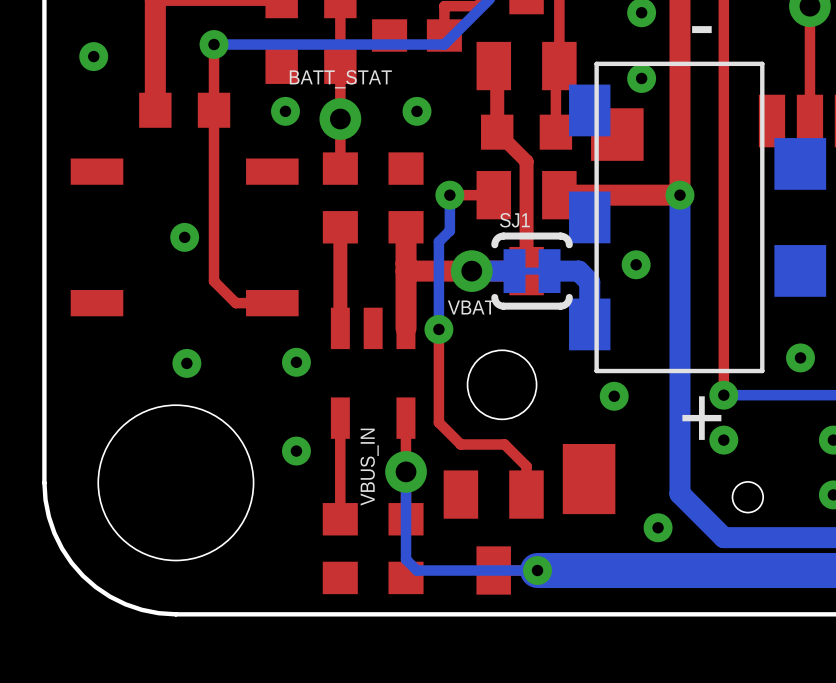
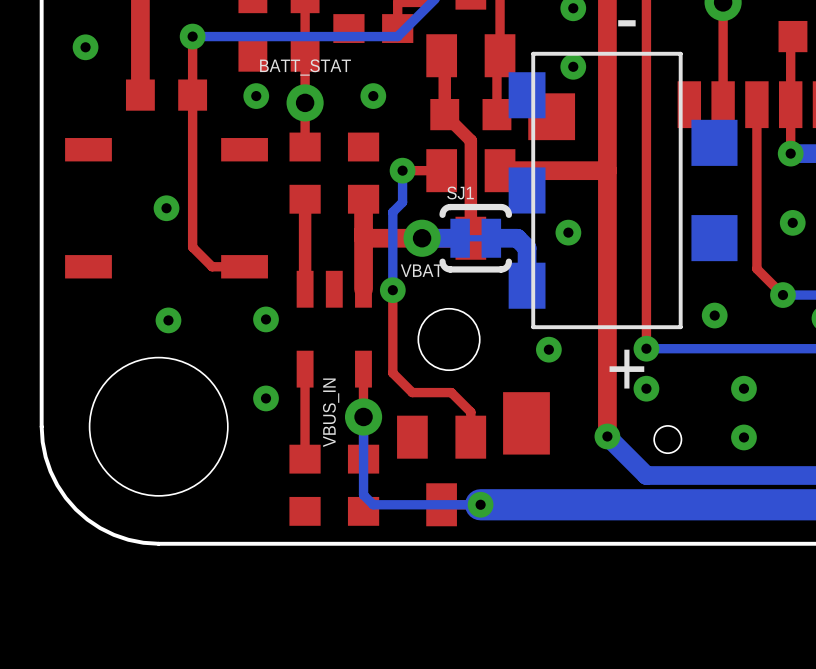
top track: none -> (607, 170) (607, 436)
bottom track: (679, 195) (679, 493) -> none
via: (679, 195) -> none
via position: (658, 527) -> (607, 436)

